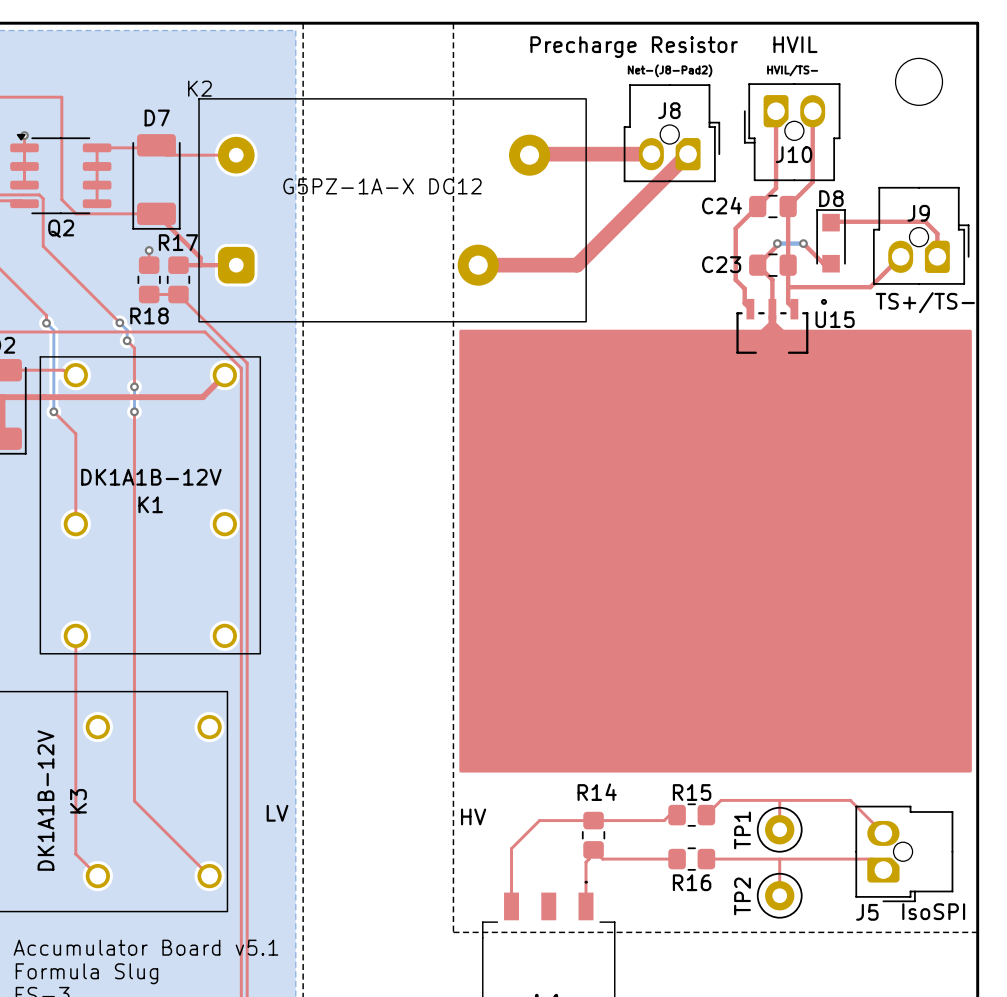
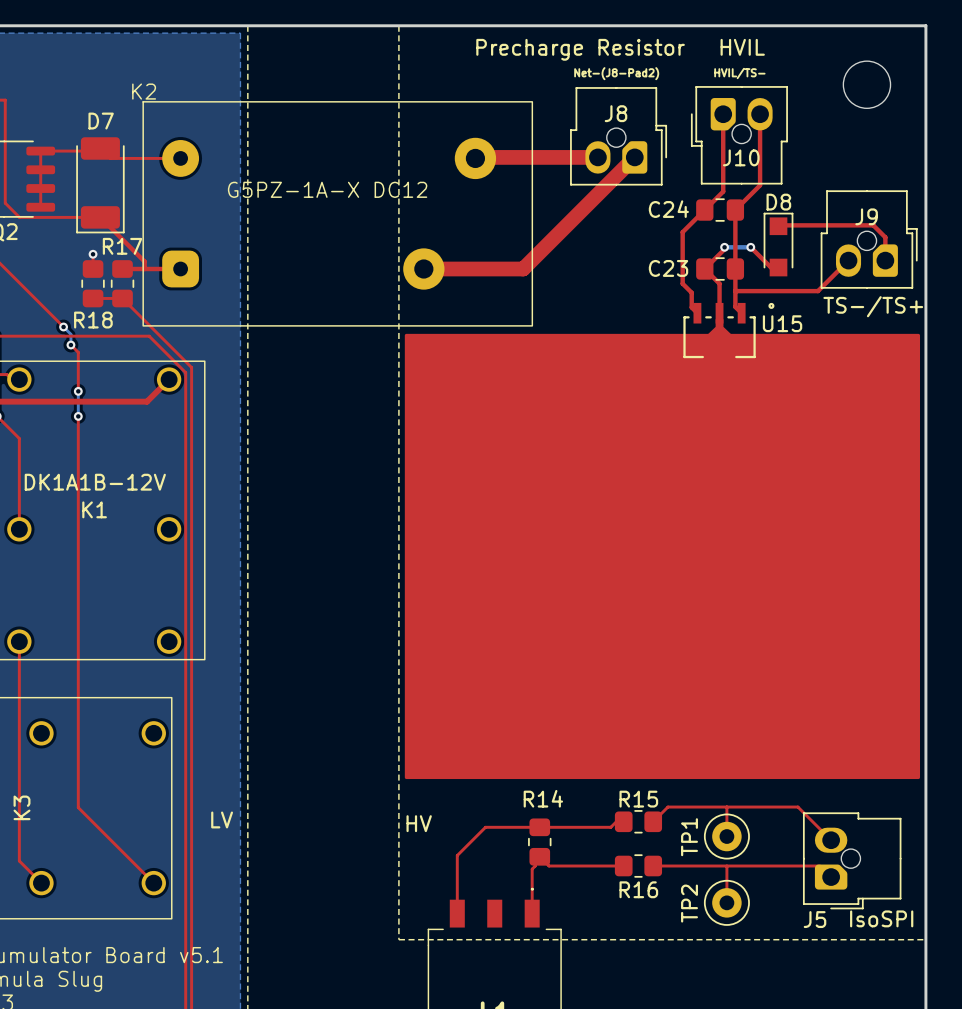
J9 value: TS+/TS- (925, 302) -> TS-/TS+ (873, 306)

